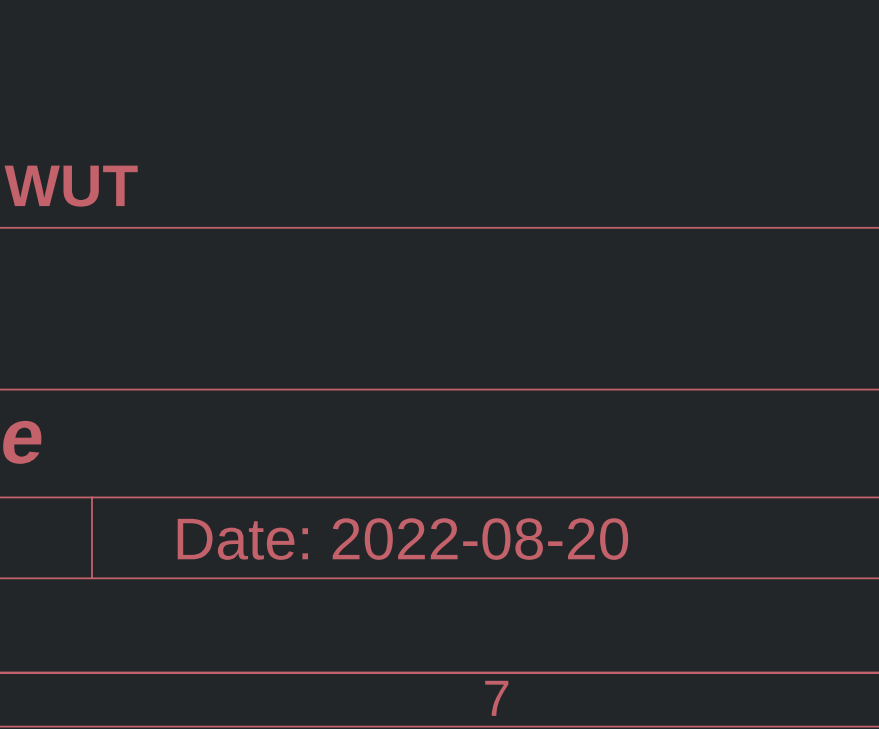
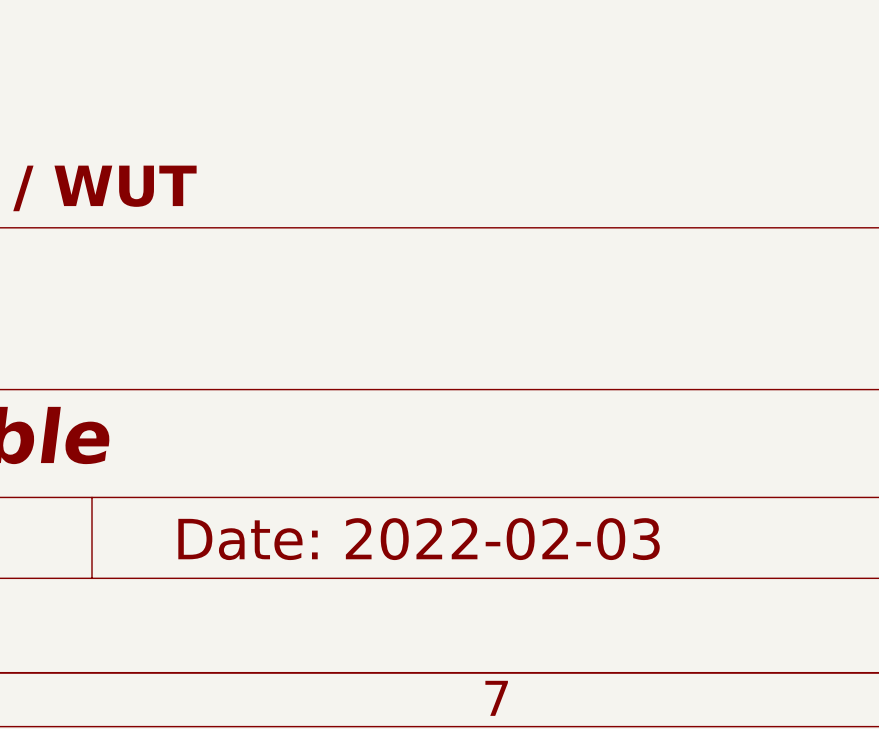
title block: Date: 2022-08-20 (402, 539) -> Date: 2022-02-03 (419, 539)

